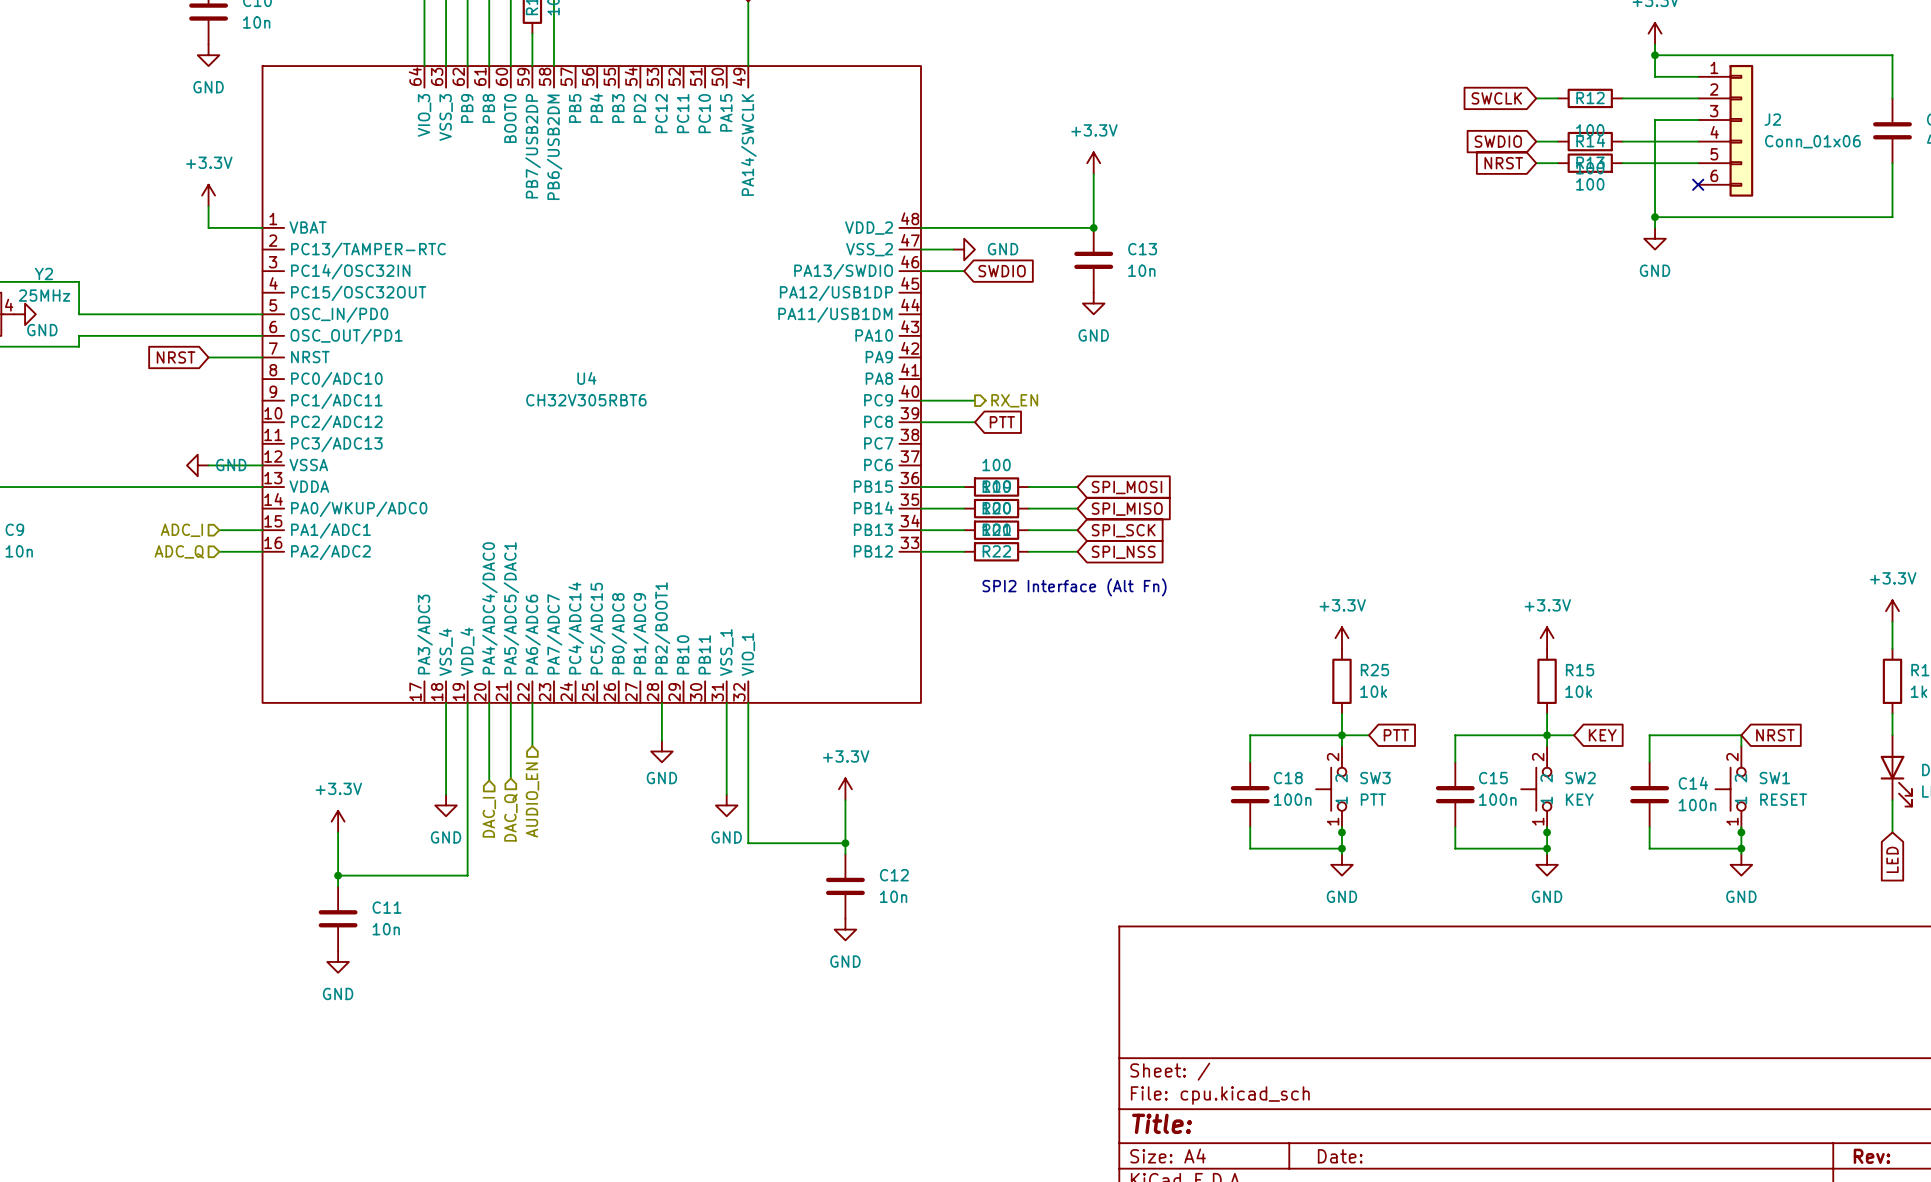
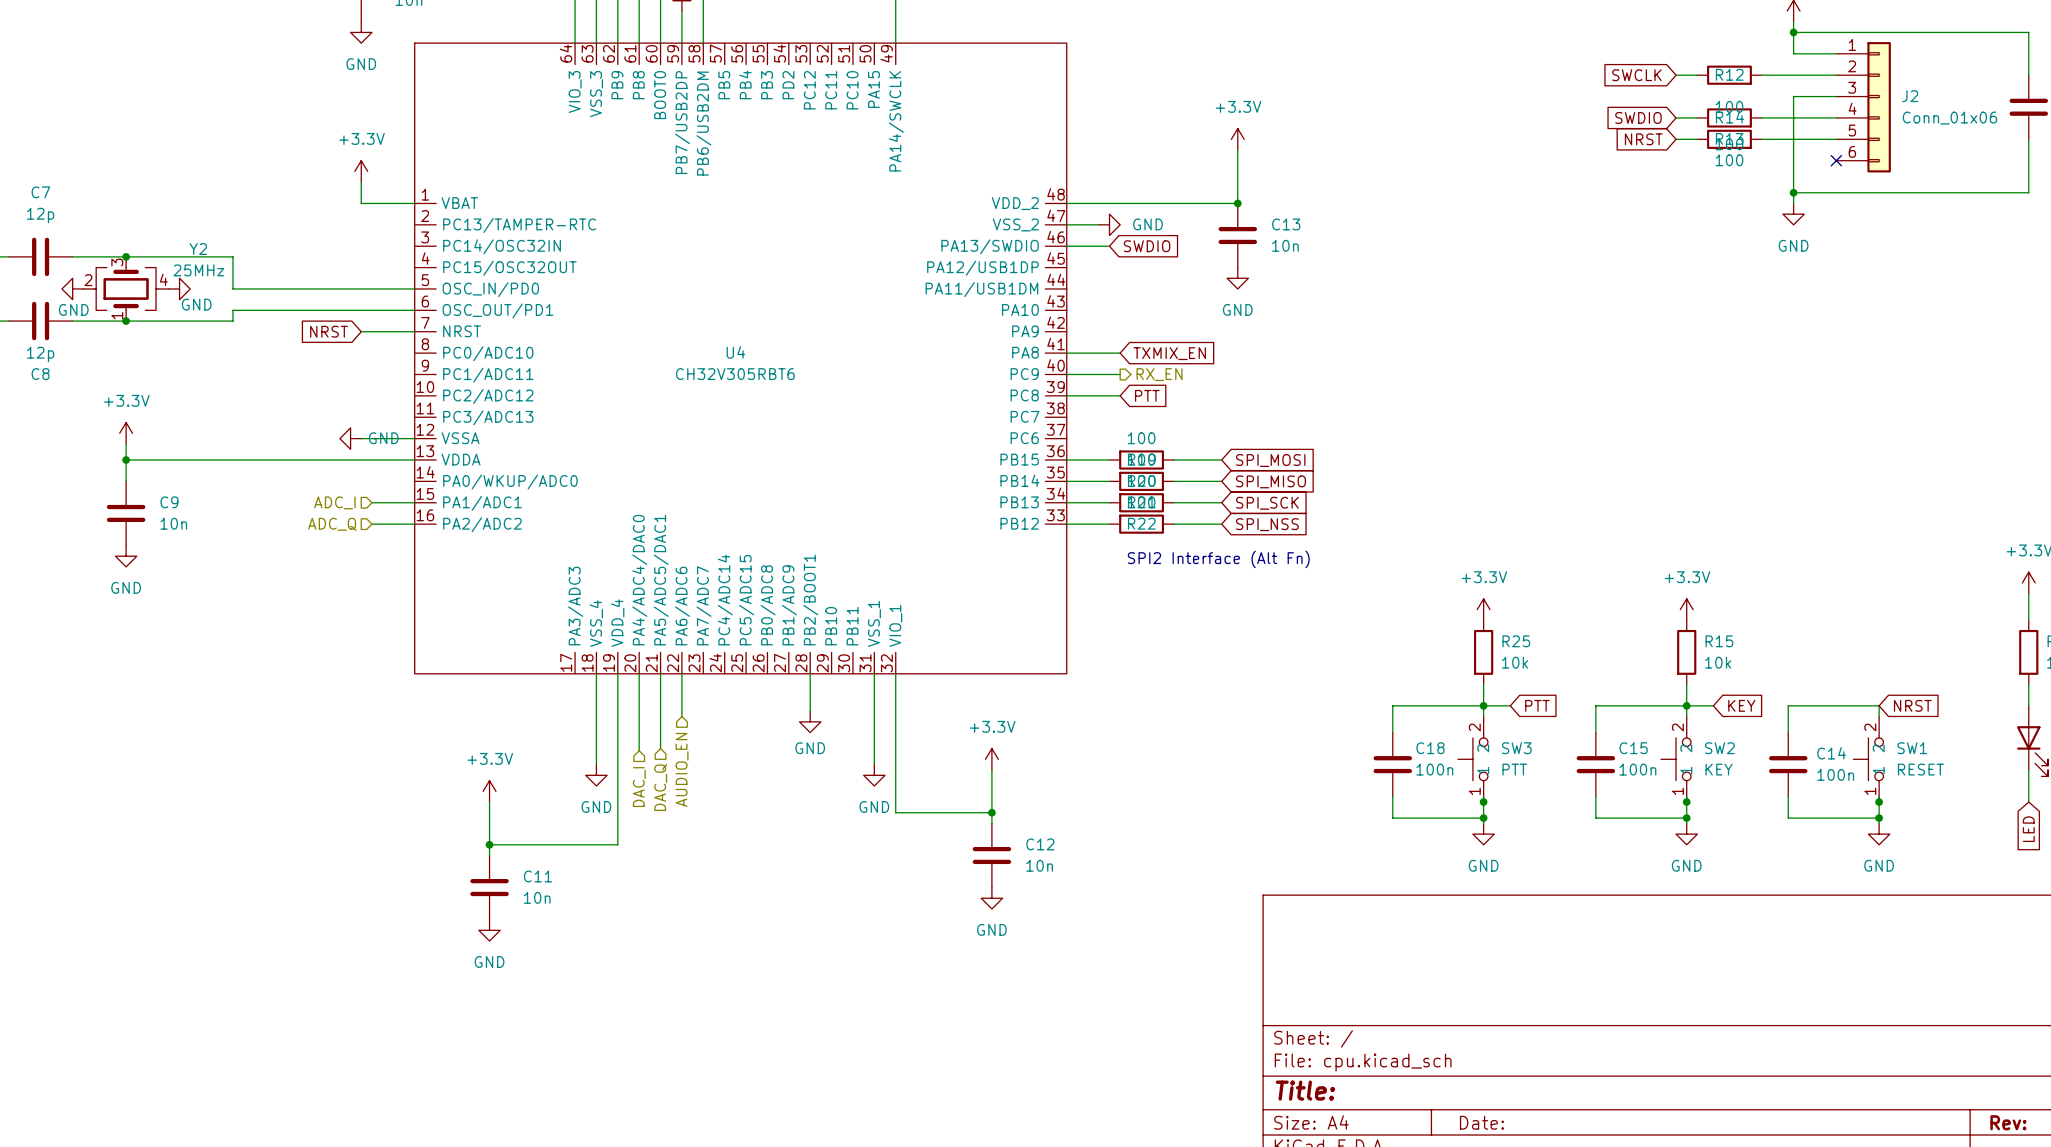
wire: none -> (1066, 353) (1120, 353)
global label: none -> TXMIX_EN (1169, 353)

